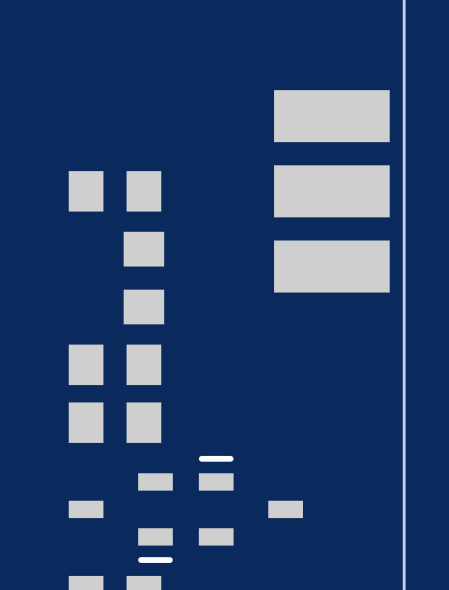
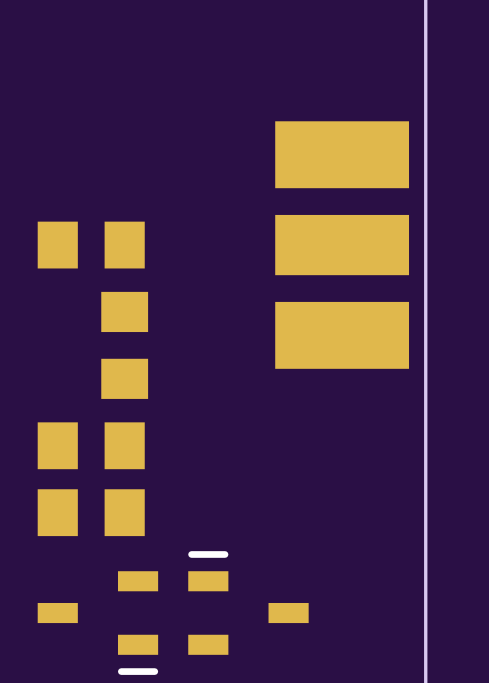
part footprint: [274, 90, 390, 293] -> [275, 121, 410, 369]

